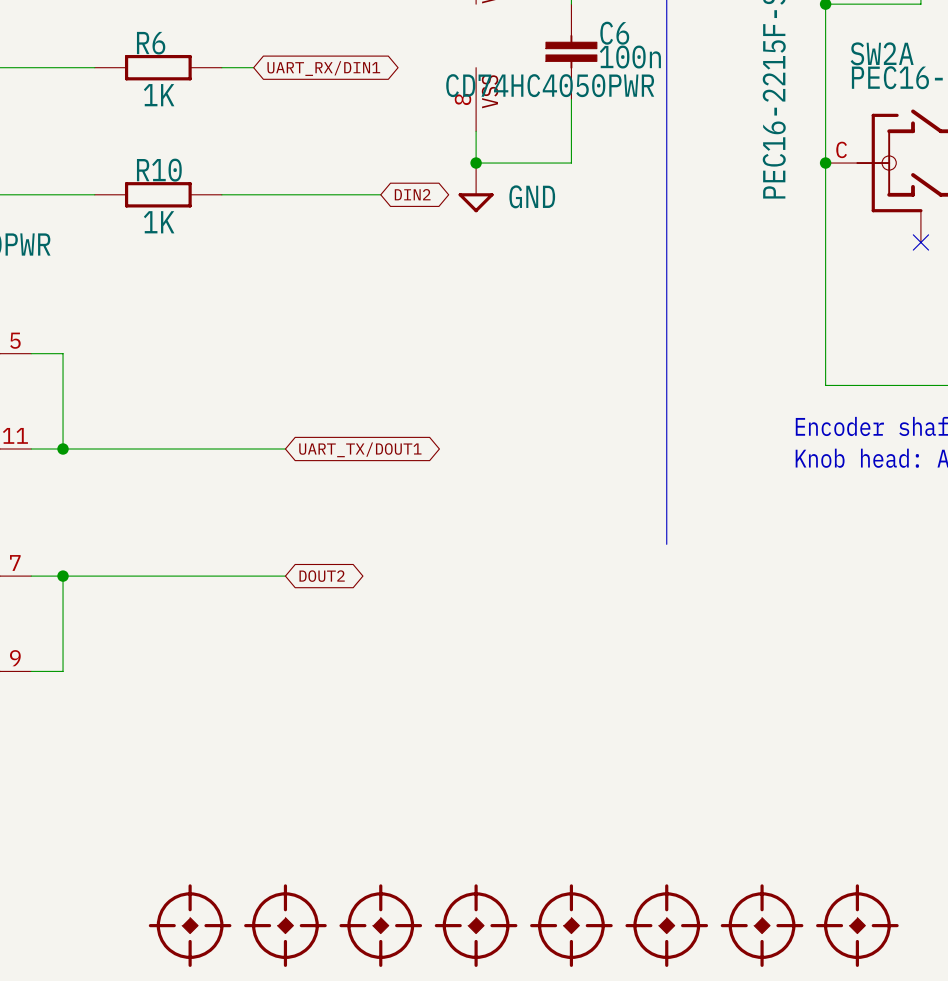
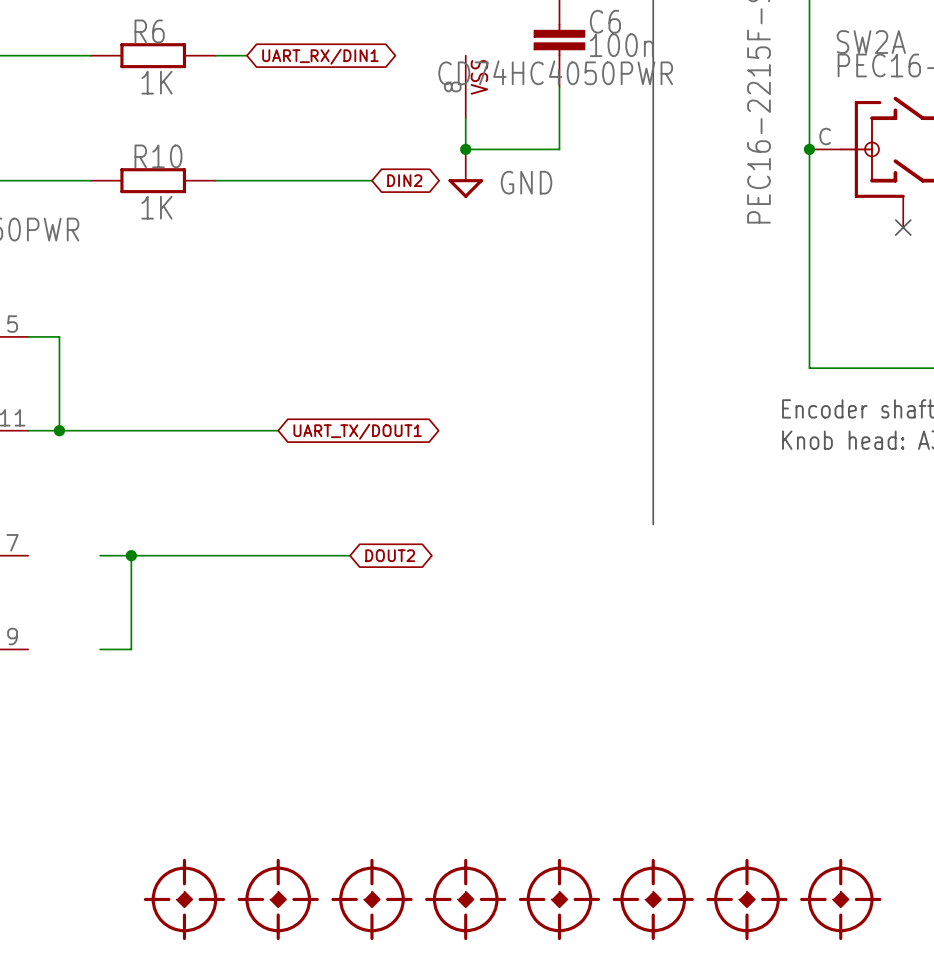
wire: (31, 576) (104, 576) -> (278, 555) (350, 555)
wire: (63, 576) (63, 671) (31, 671) -> (131, 555) (131, 649) (100, 649)
junction position: (63, 576) -> (131, 555)
global label position: DOUT2 (322, 576) -> DOUT2 (390, 555)

